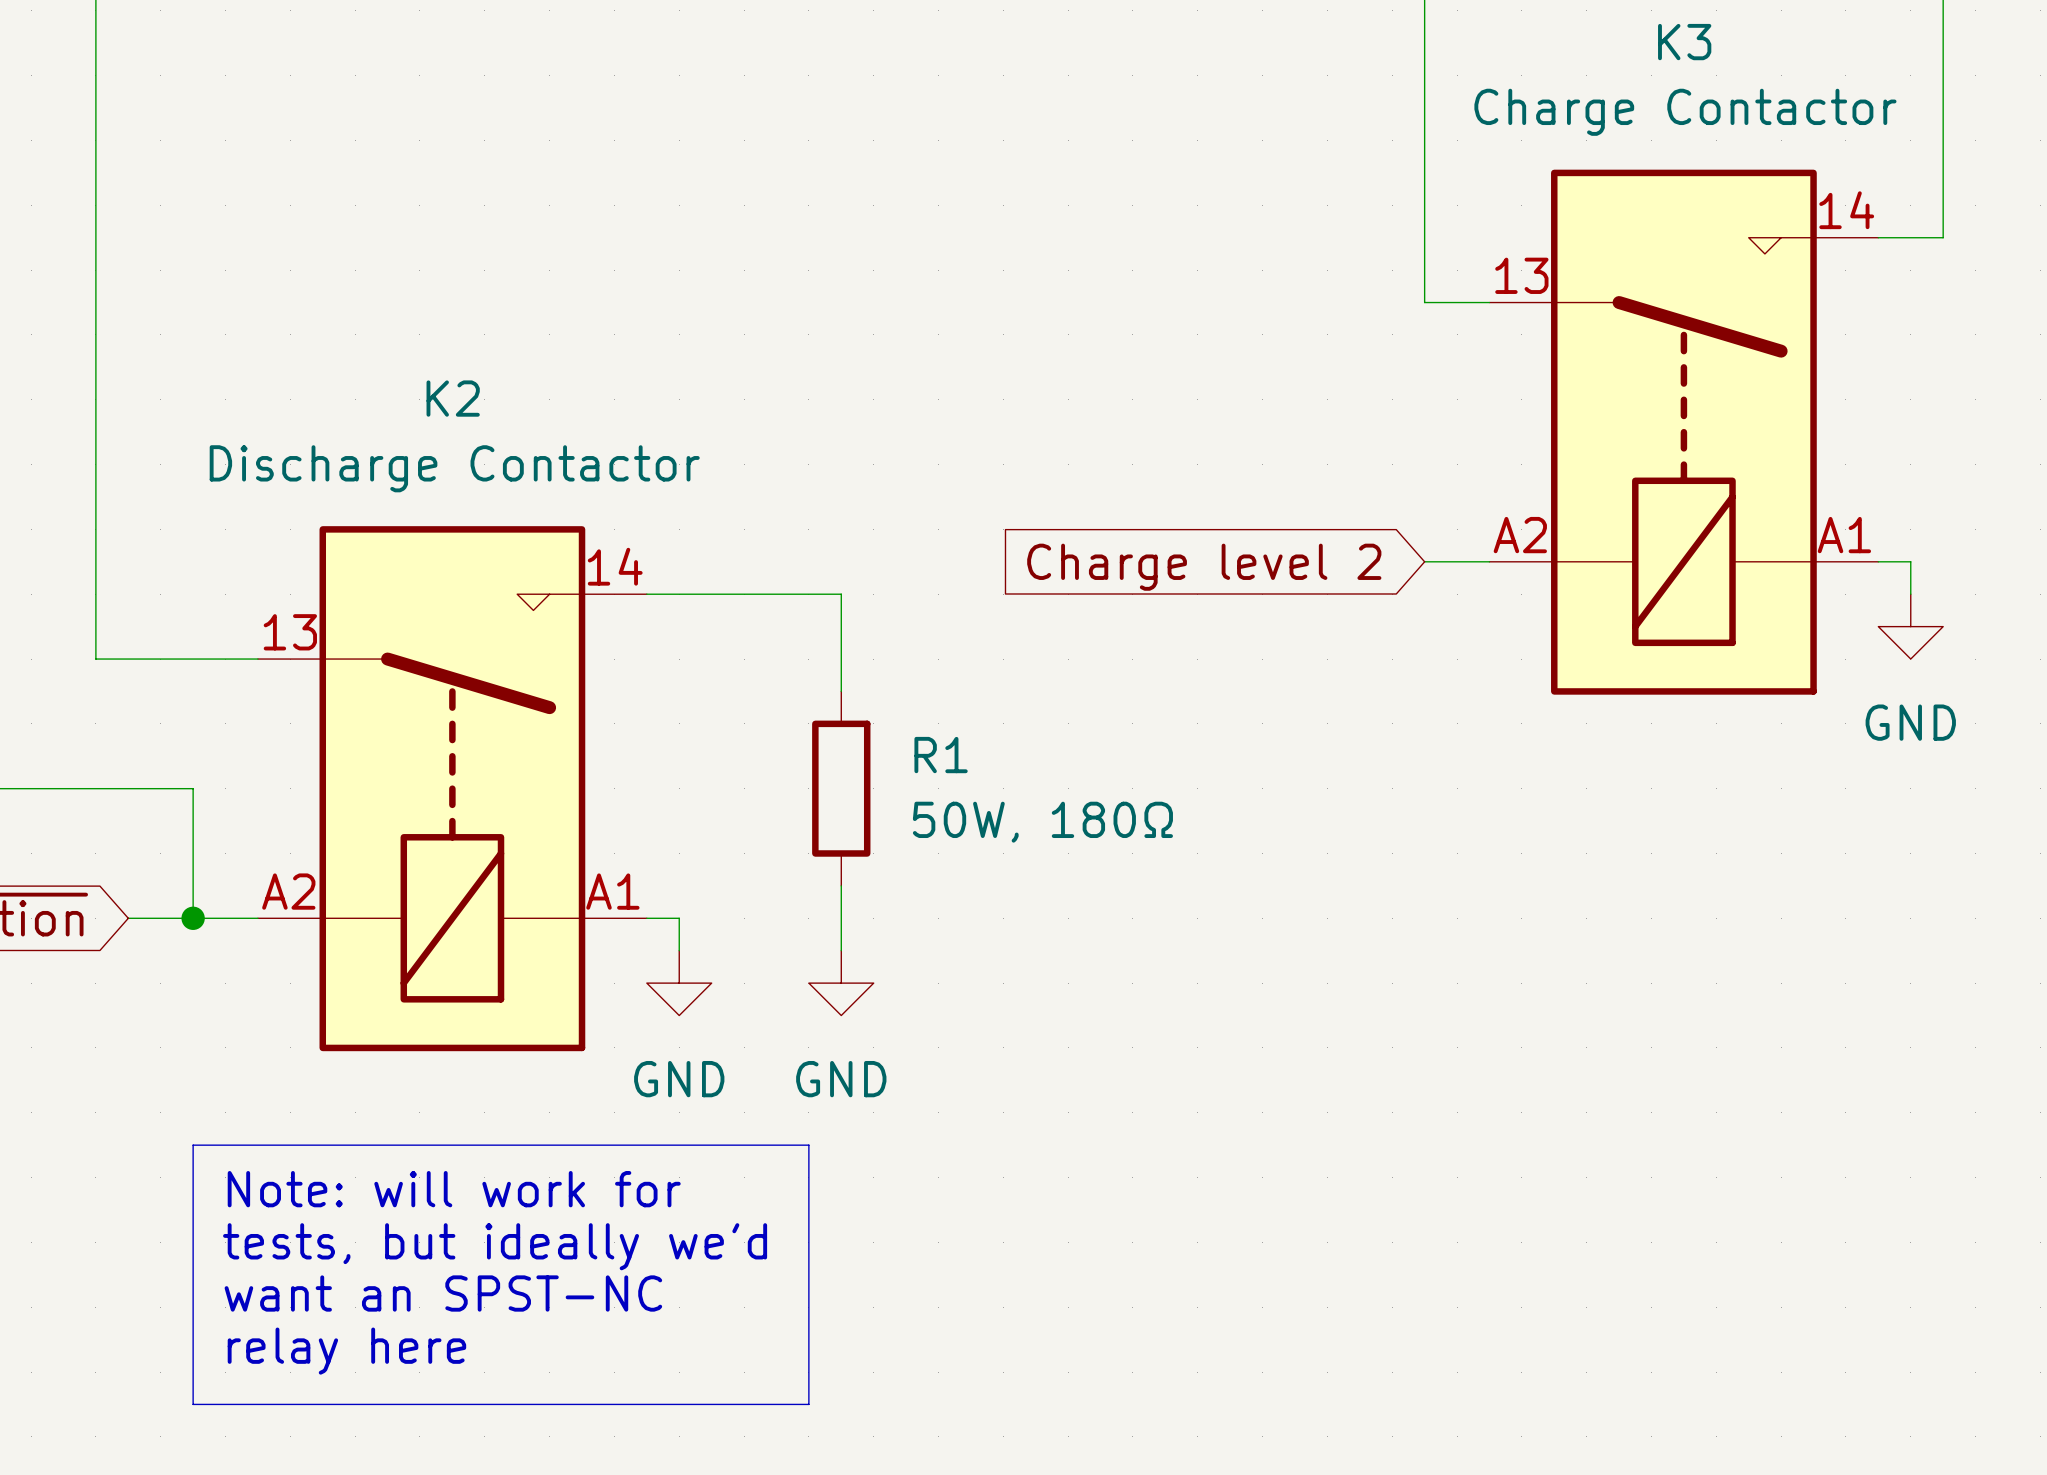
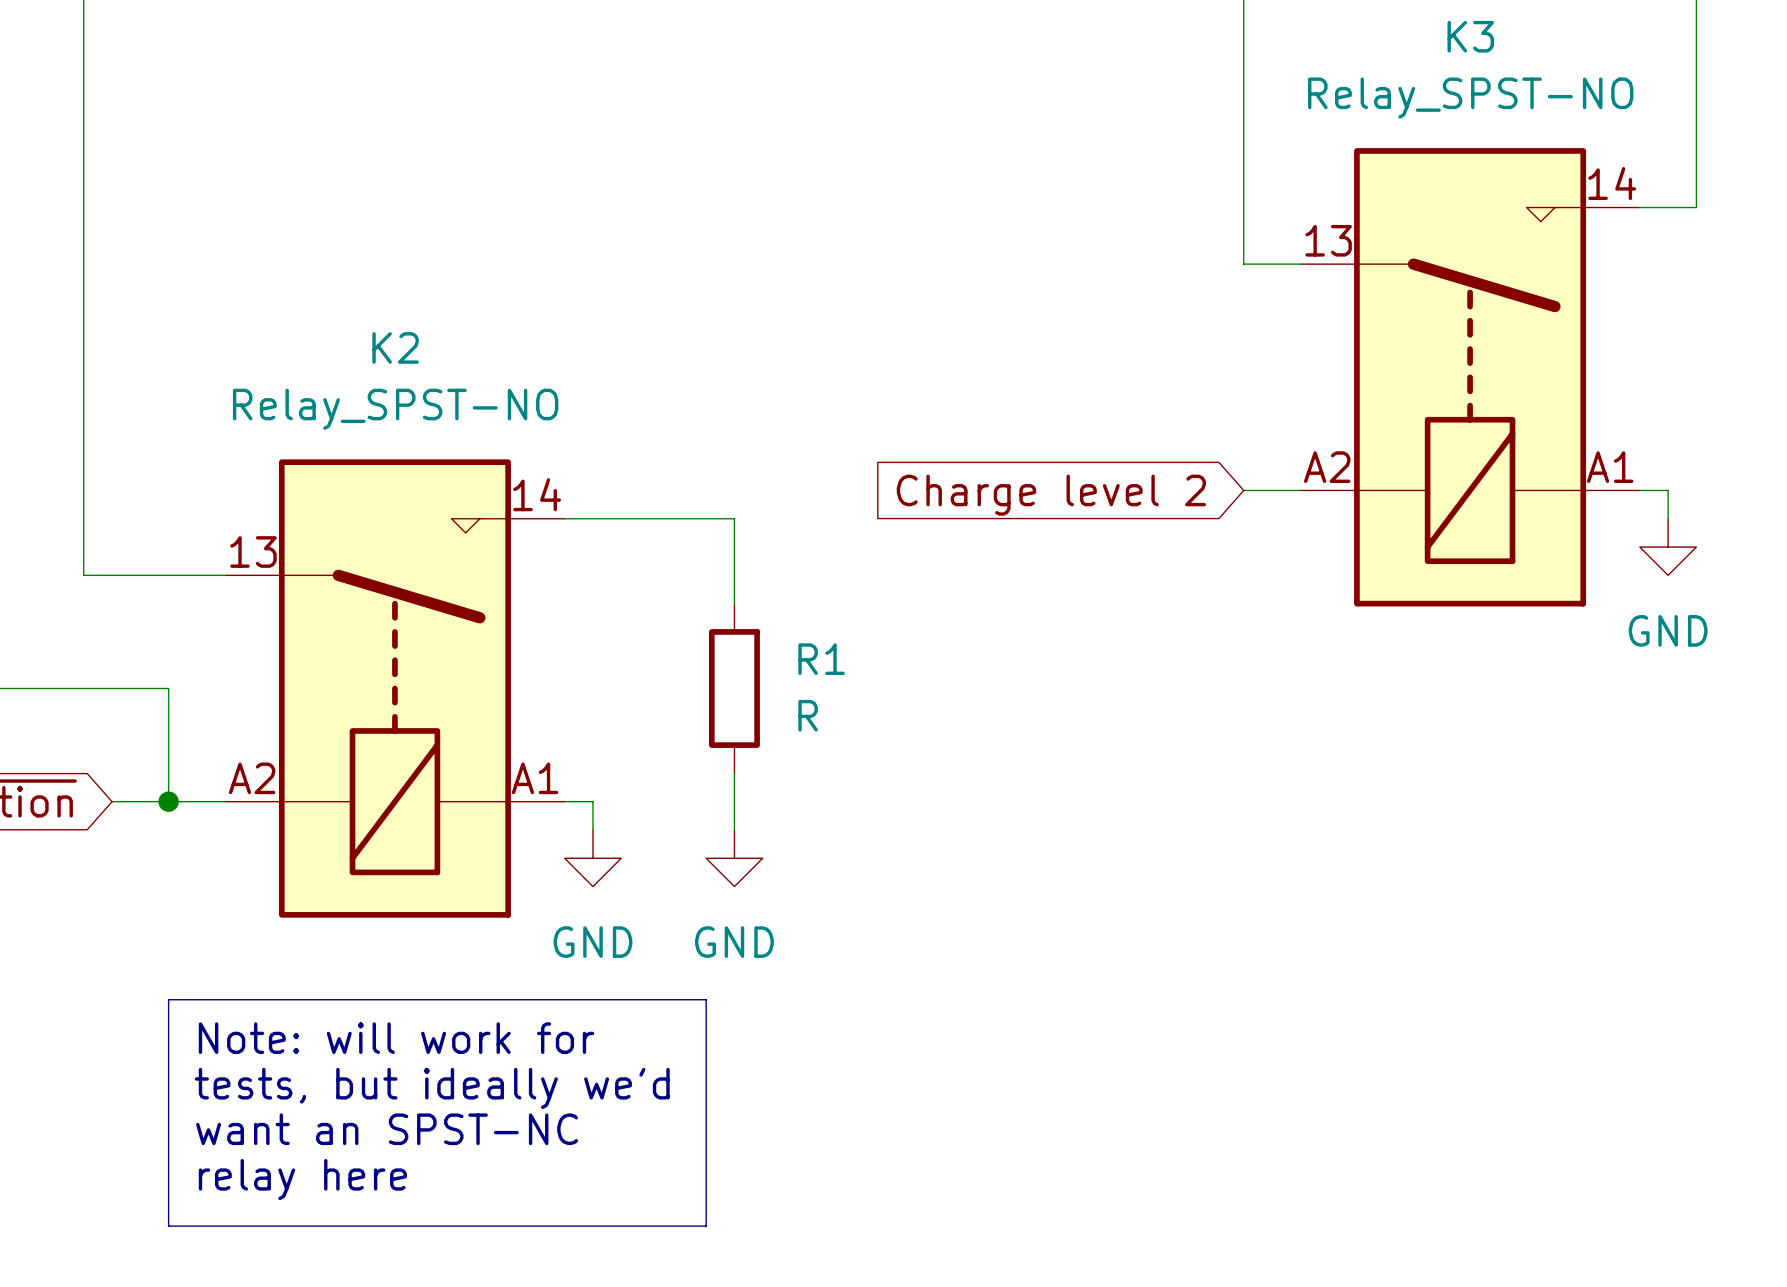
K3 value: Charge Contactor (1685, 112) -> Relay_SPST-NO (1470, 98)
K2 value: Discharge Contactor (454, 468) -> Relay_SPST-NO (395, 409)
R1 value: 50W, 180Ω (1042, 822) -> R (808, 715)

